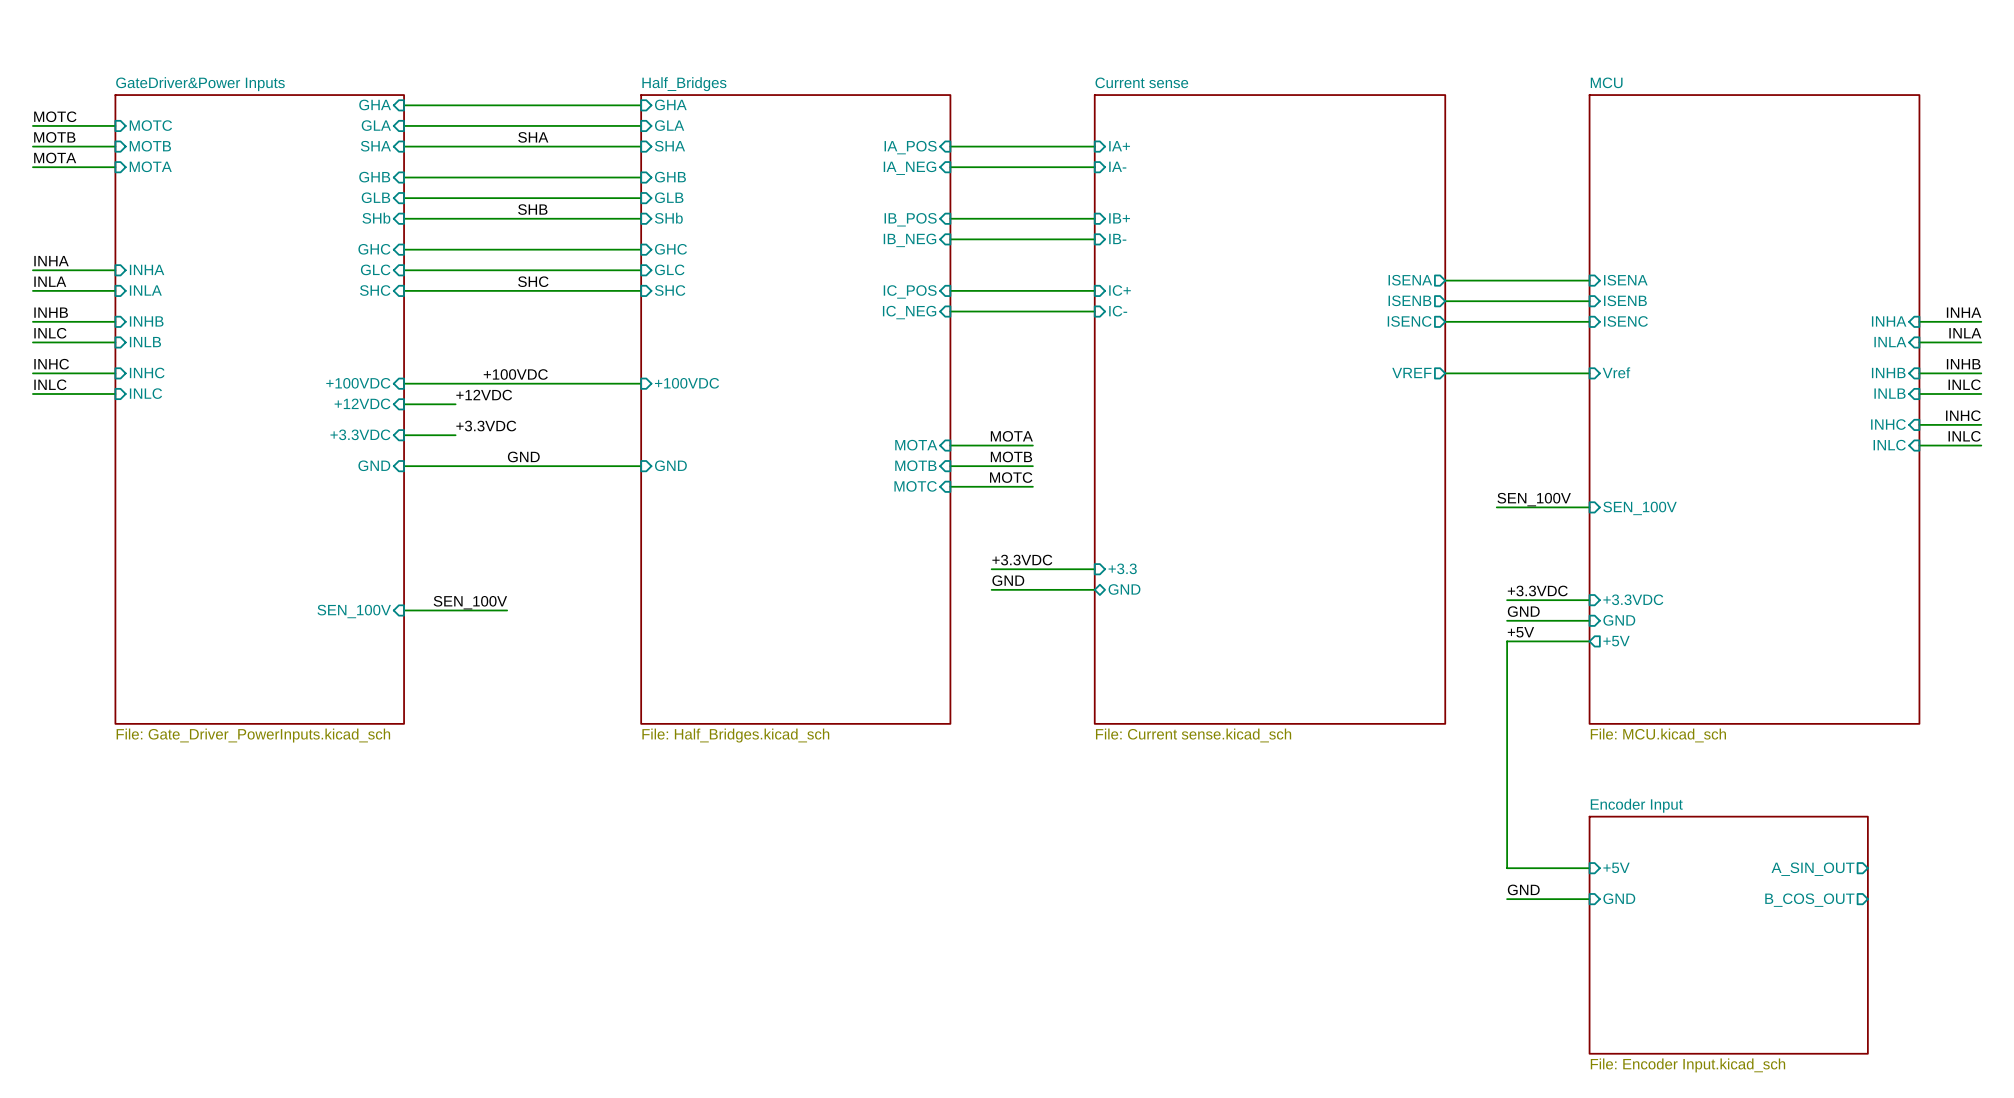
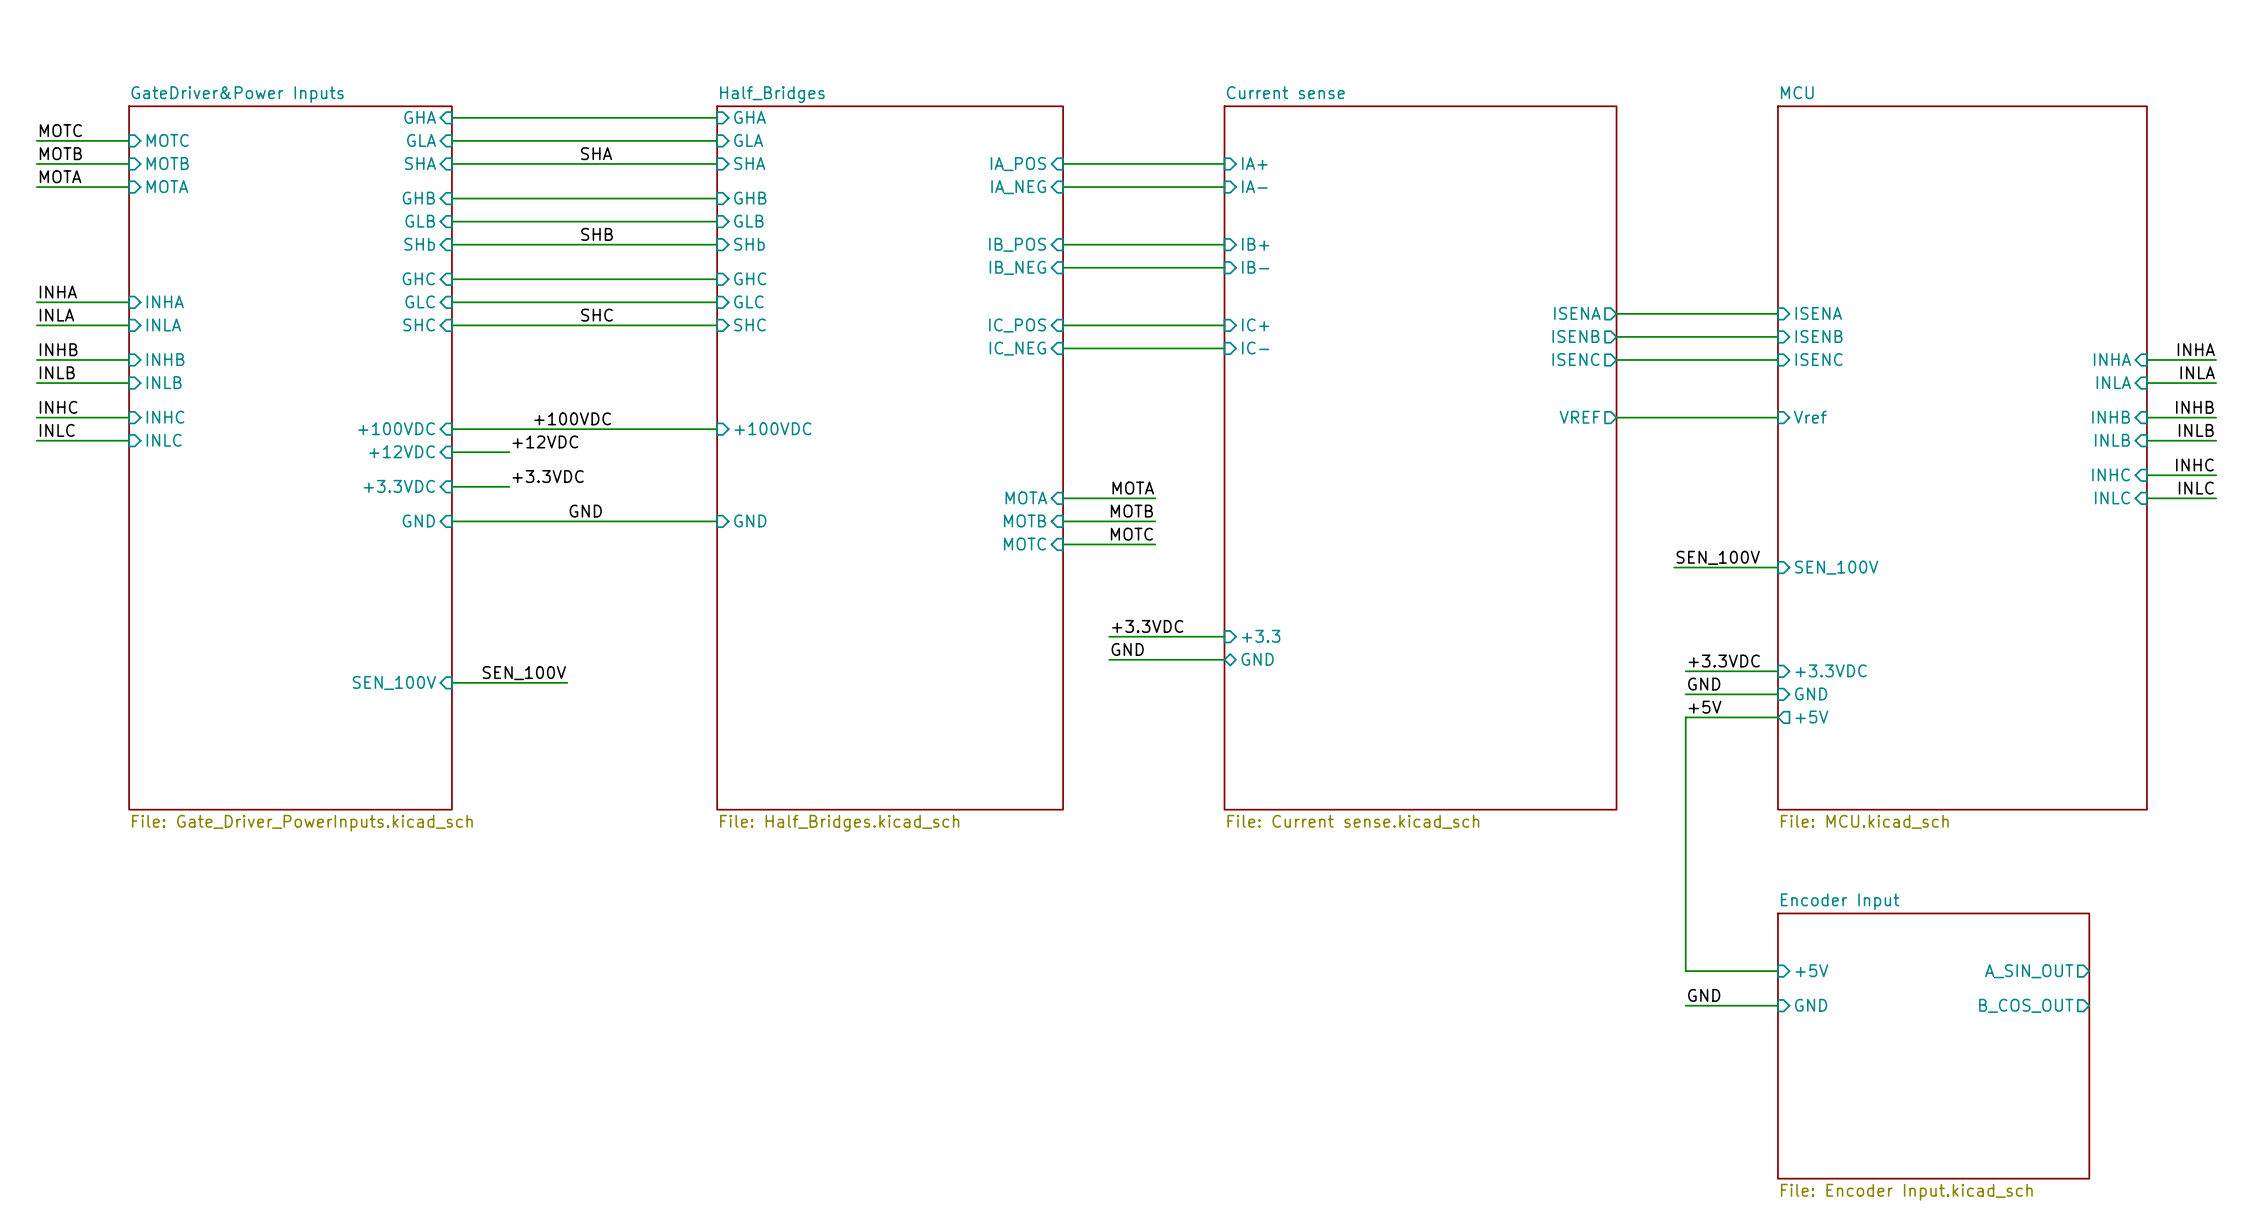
label: INLC (50, 333) -> INLB (57, 372)
label: INLC (1964, 384) -> INLB (2196, 430)

